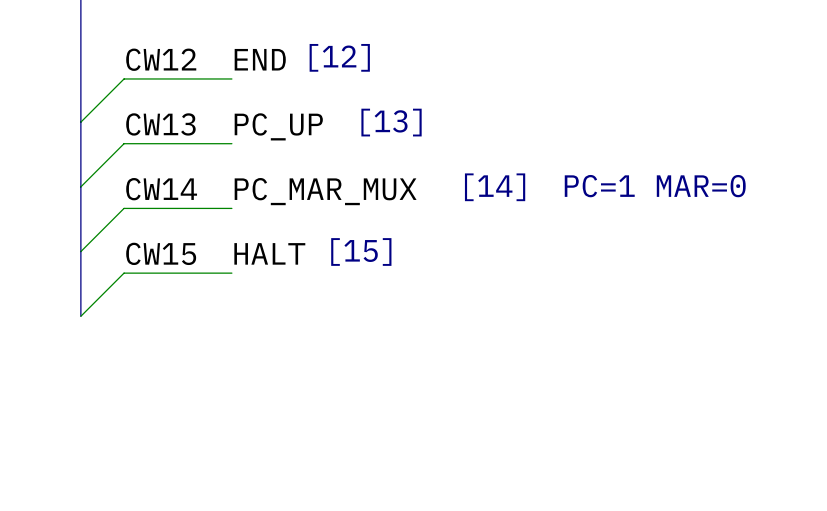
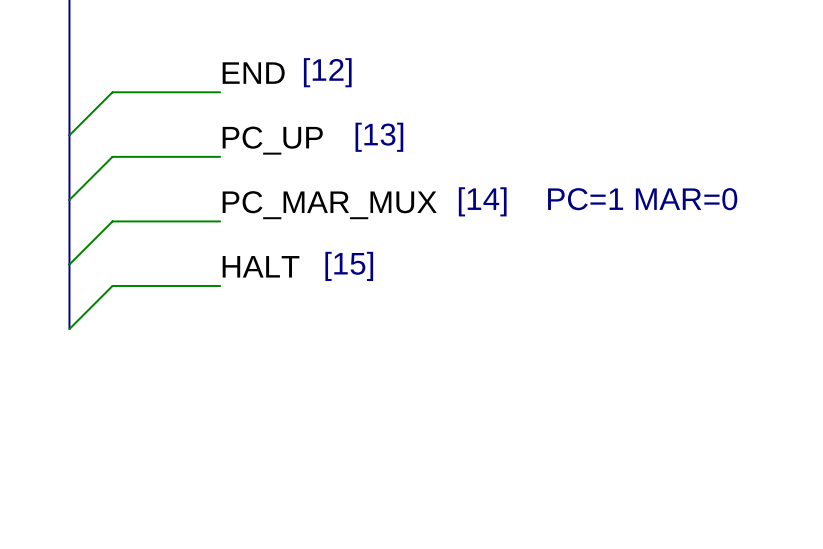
label: CW12 (161, 59) -> none
label: CW13 (160, 124) -> none
label: CW14 (161, 189) -> none
label: CW15 (161, 253) -> none

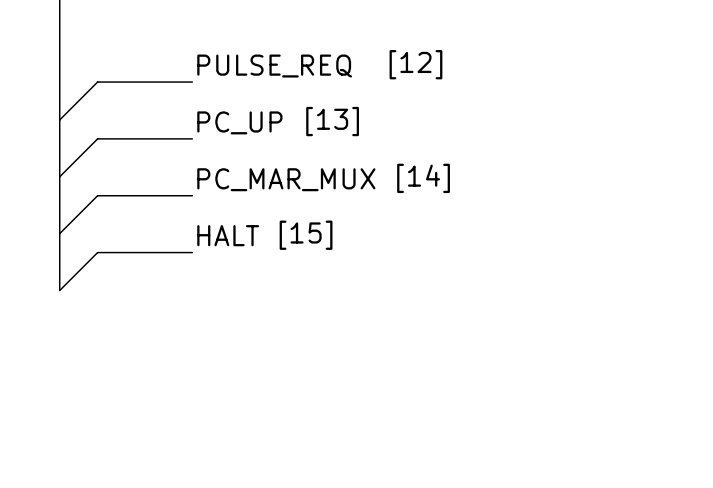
text position: [12] (327, 72) -> [12] (415, 64)
label: END (253, 73) -> PULSE_REQ (274, 66)
text: PC=1 MAR=0 (642, 199) -> none

